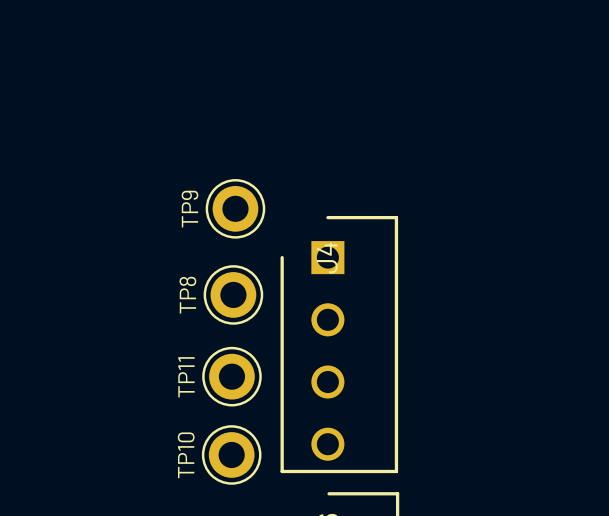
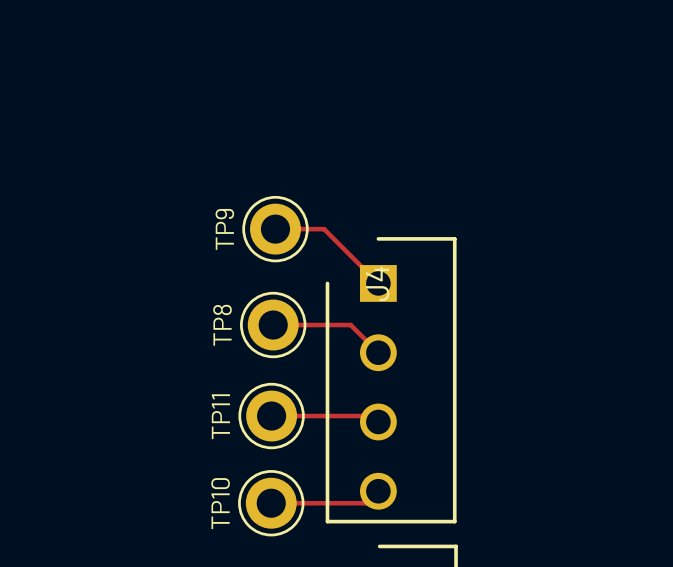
track: none -> (275, 229) (324, 229) (378, 283)
track: none -> (273, 325) (350, 325) (378, 352)
track: none -> (271, 416) (372, 416) (378, 421)
track: none -> (378, 491) (366, 503) (271, 503)

